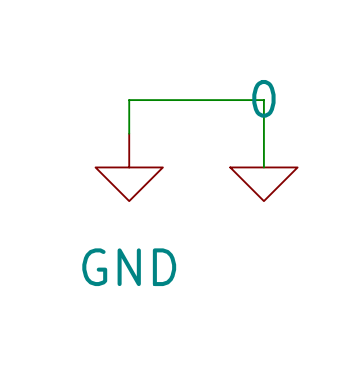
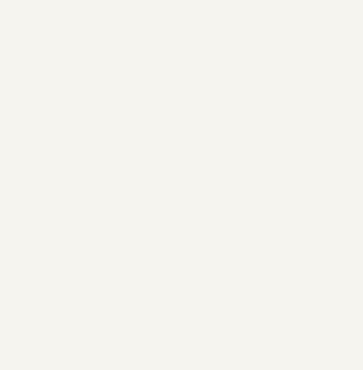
wire: (129, 133) (129, 100) (263, 100) (263, 167) -> none
power symbol: GND (129, 167) -> none
power symbol: 0 (263, 184) -> none

